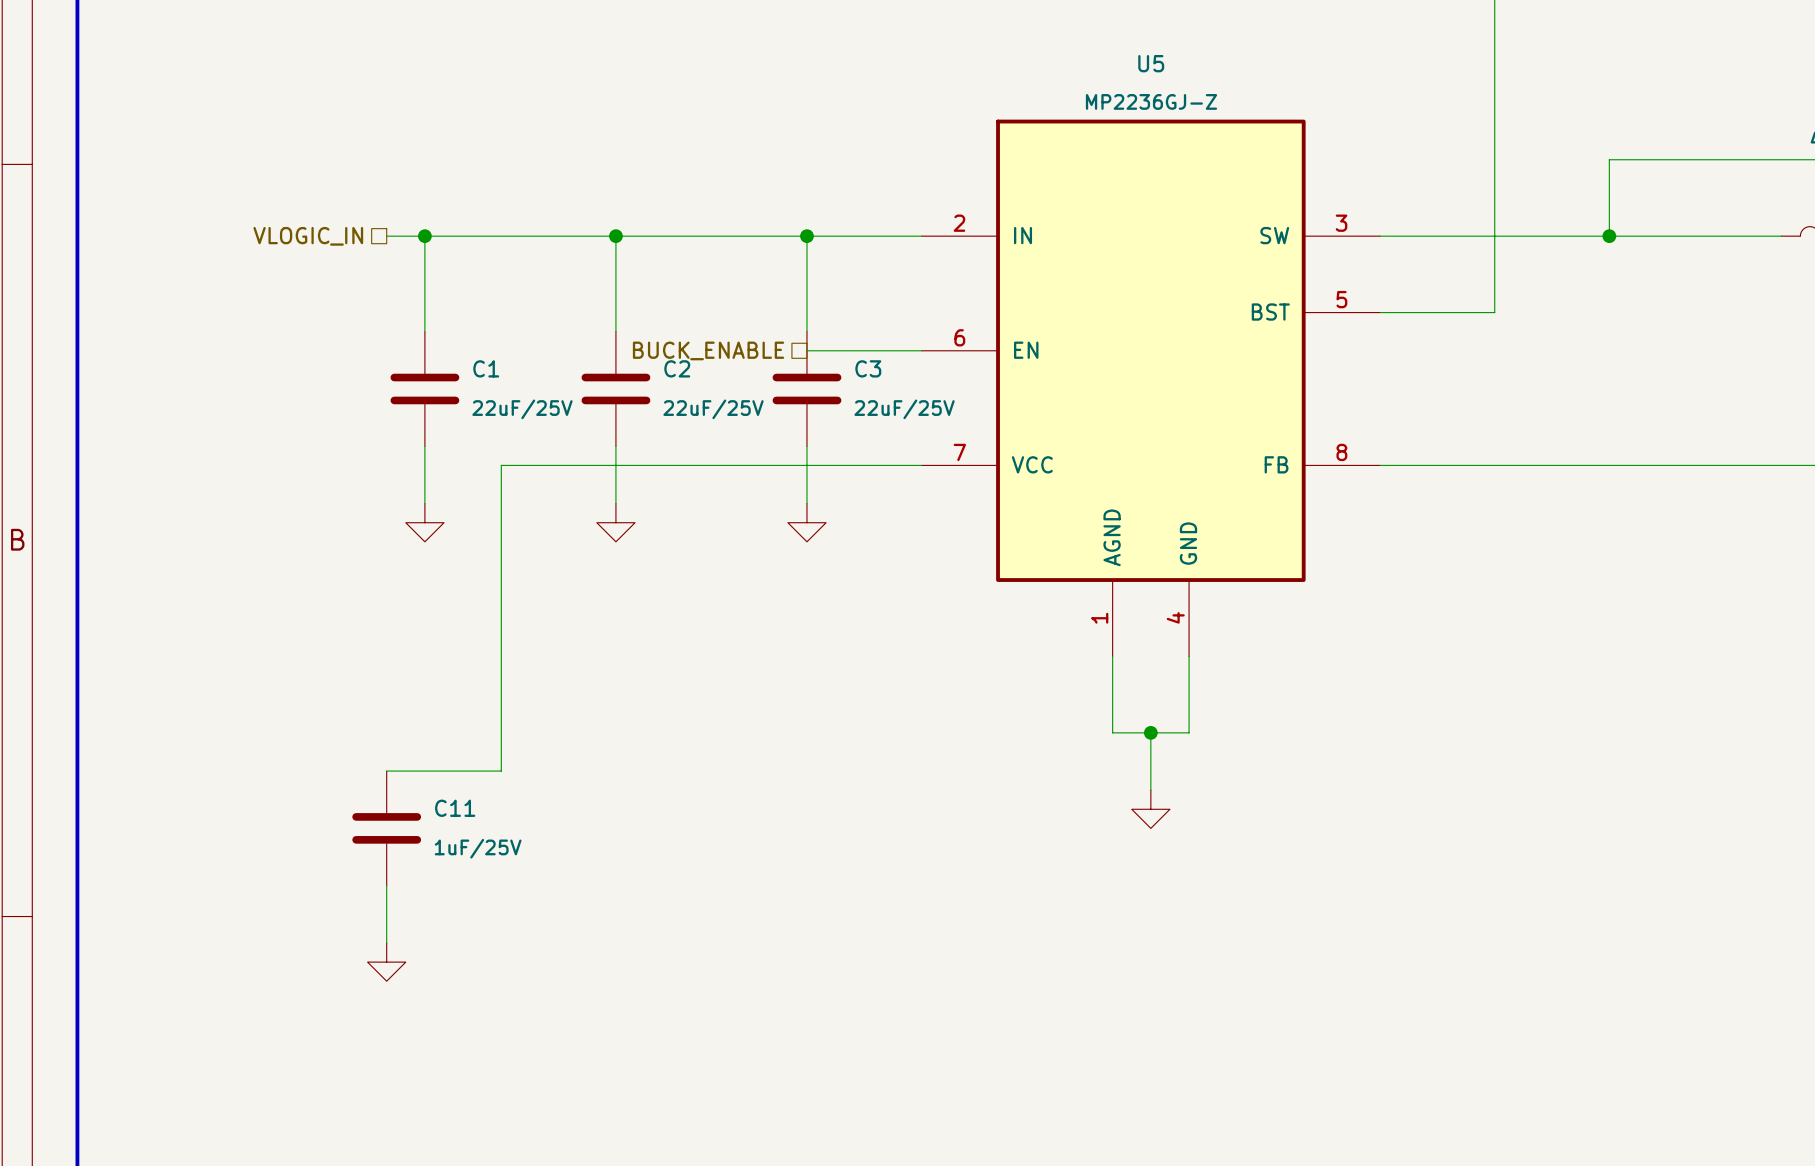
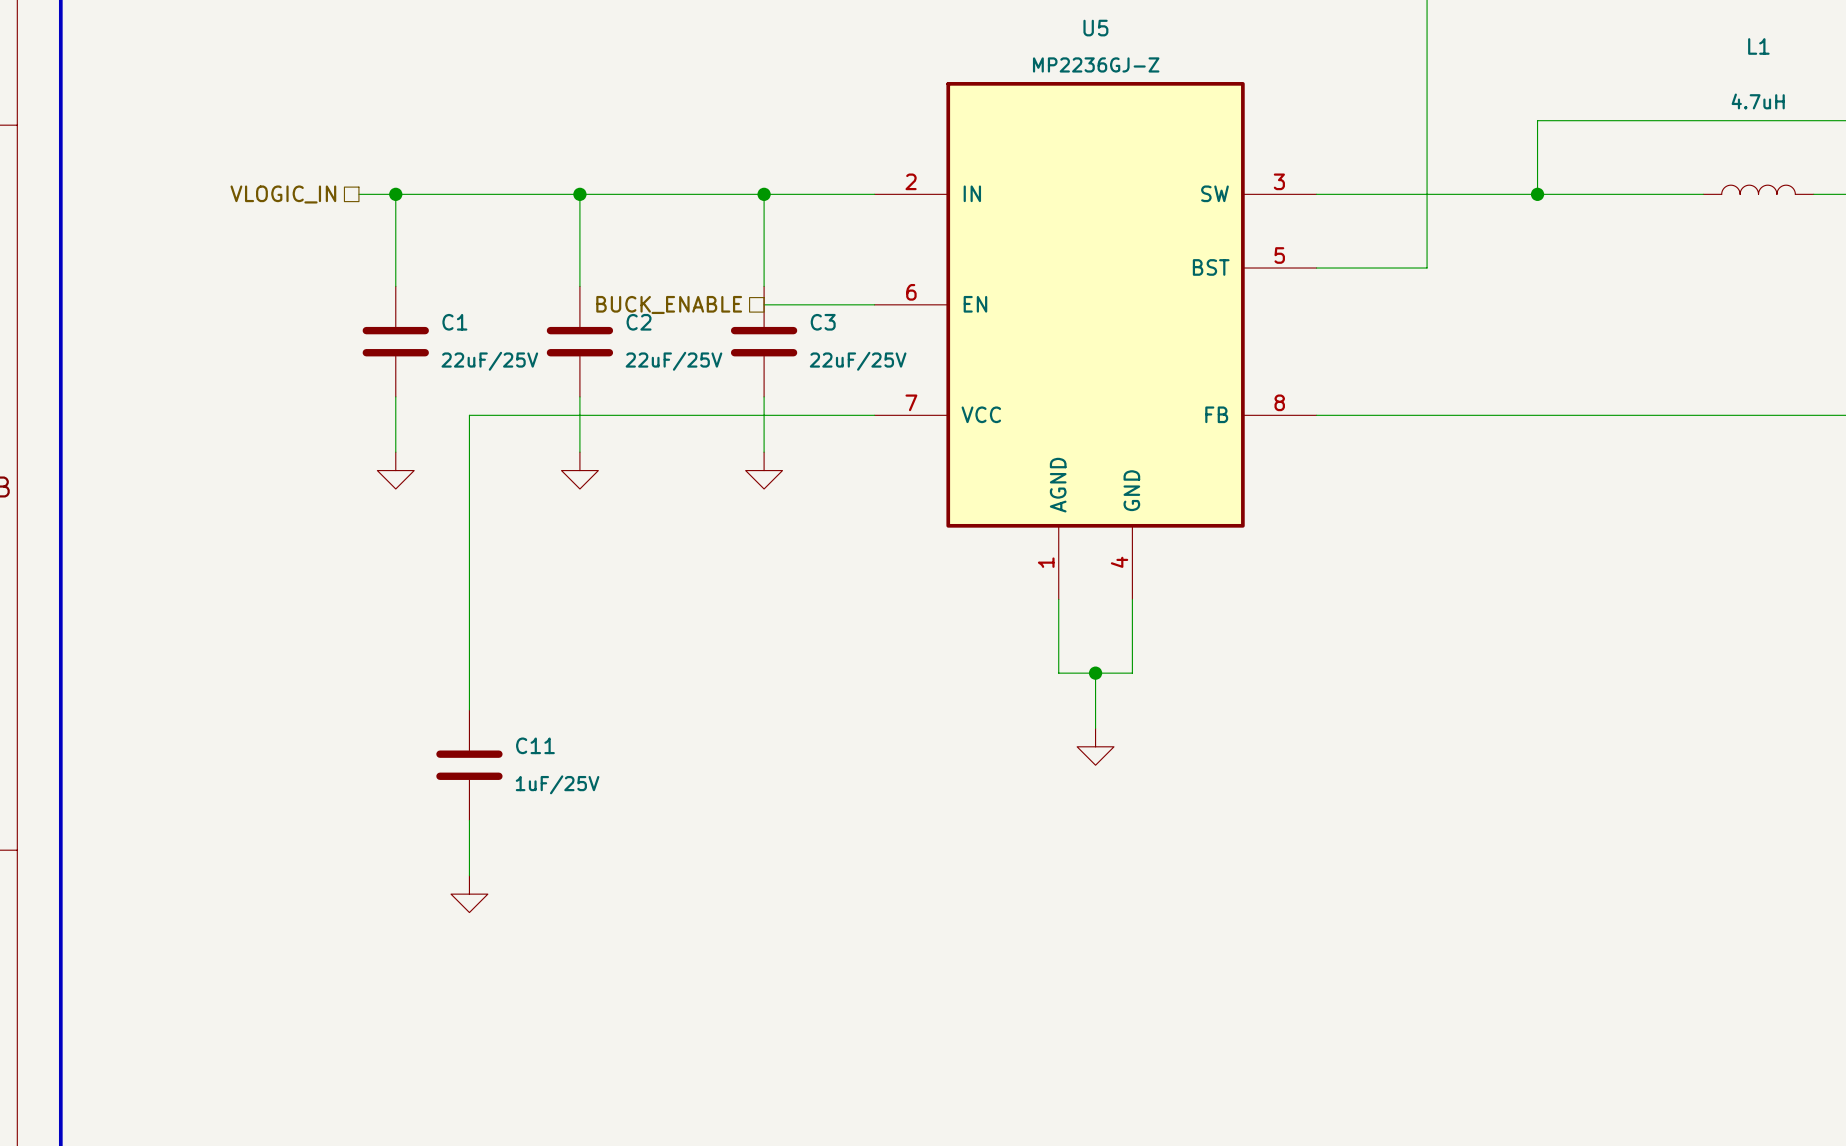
wire: (386, 771) (501, 771) -> none
C11 position: (386, 828) -> (469, 765)
wire: (386, 885) (386, 943) -> (469, 820) (469, 875)
power symbol position: (386, 962) -> (469, 894)

